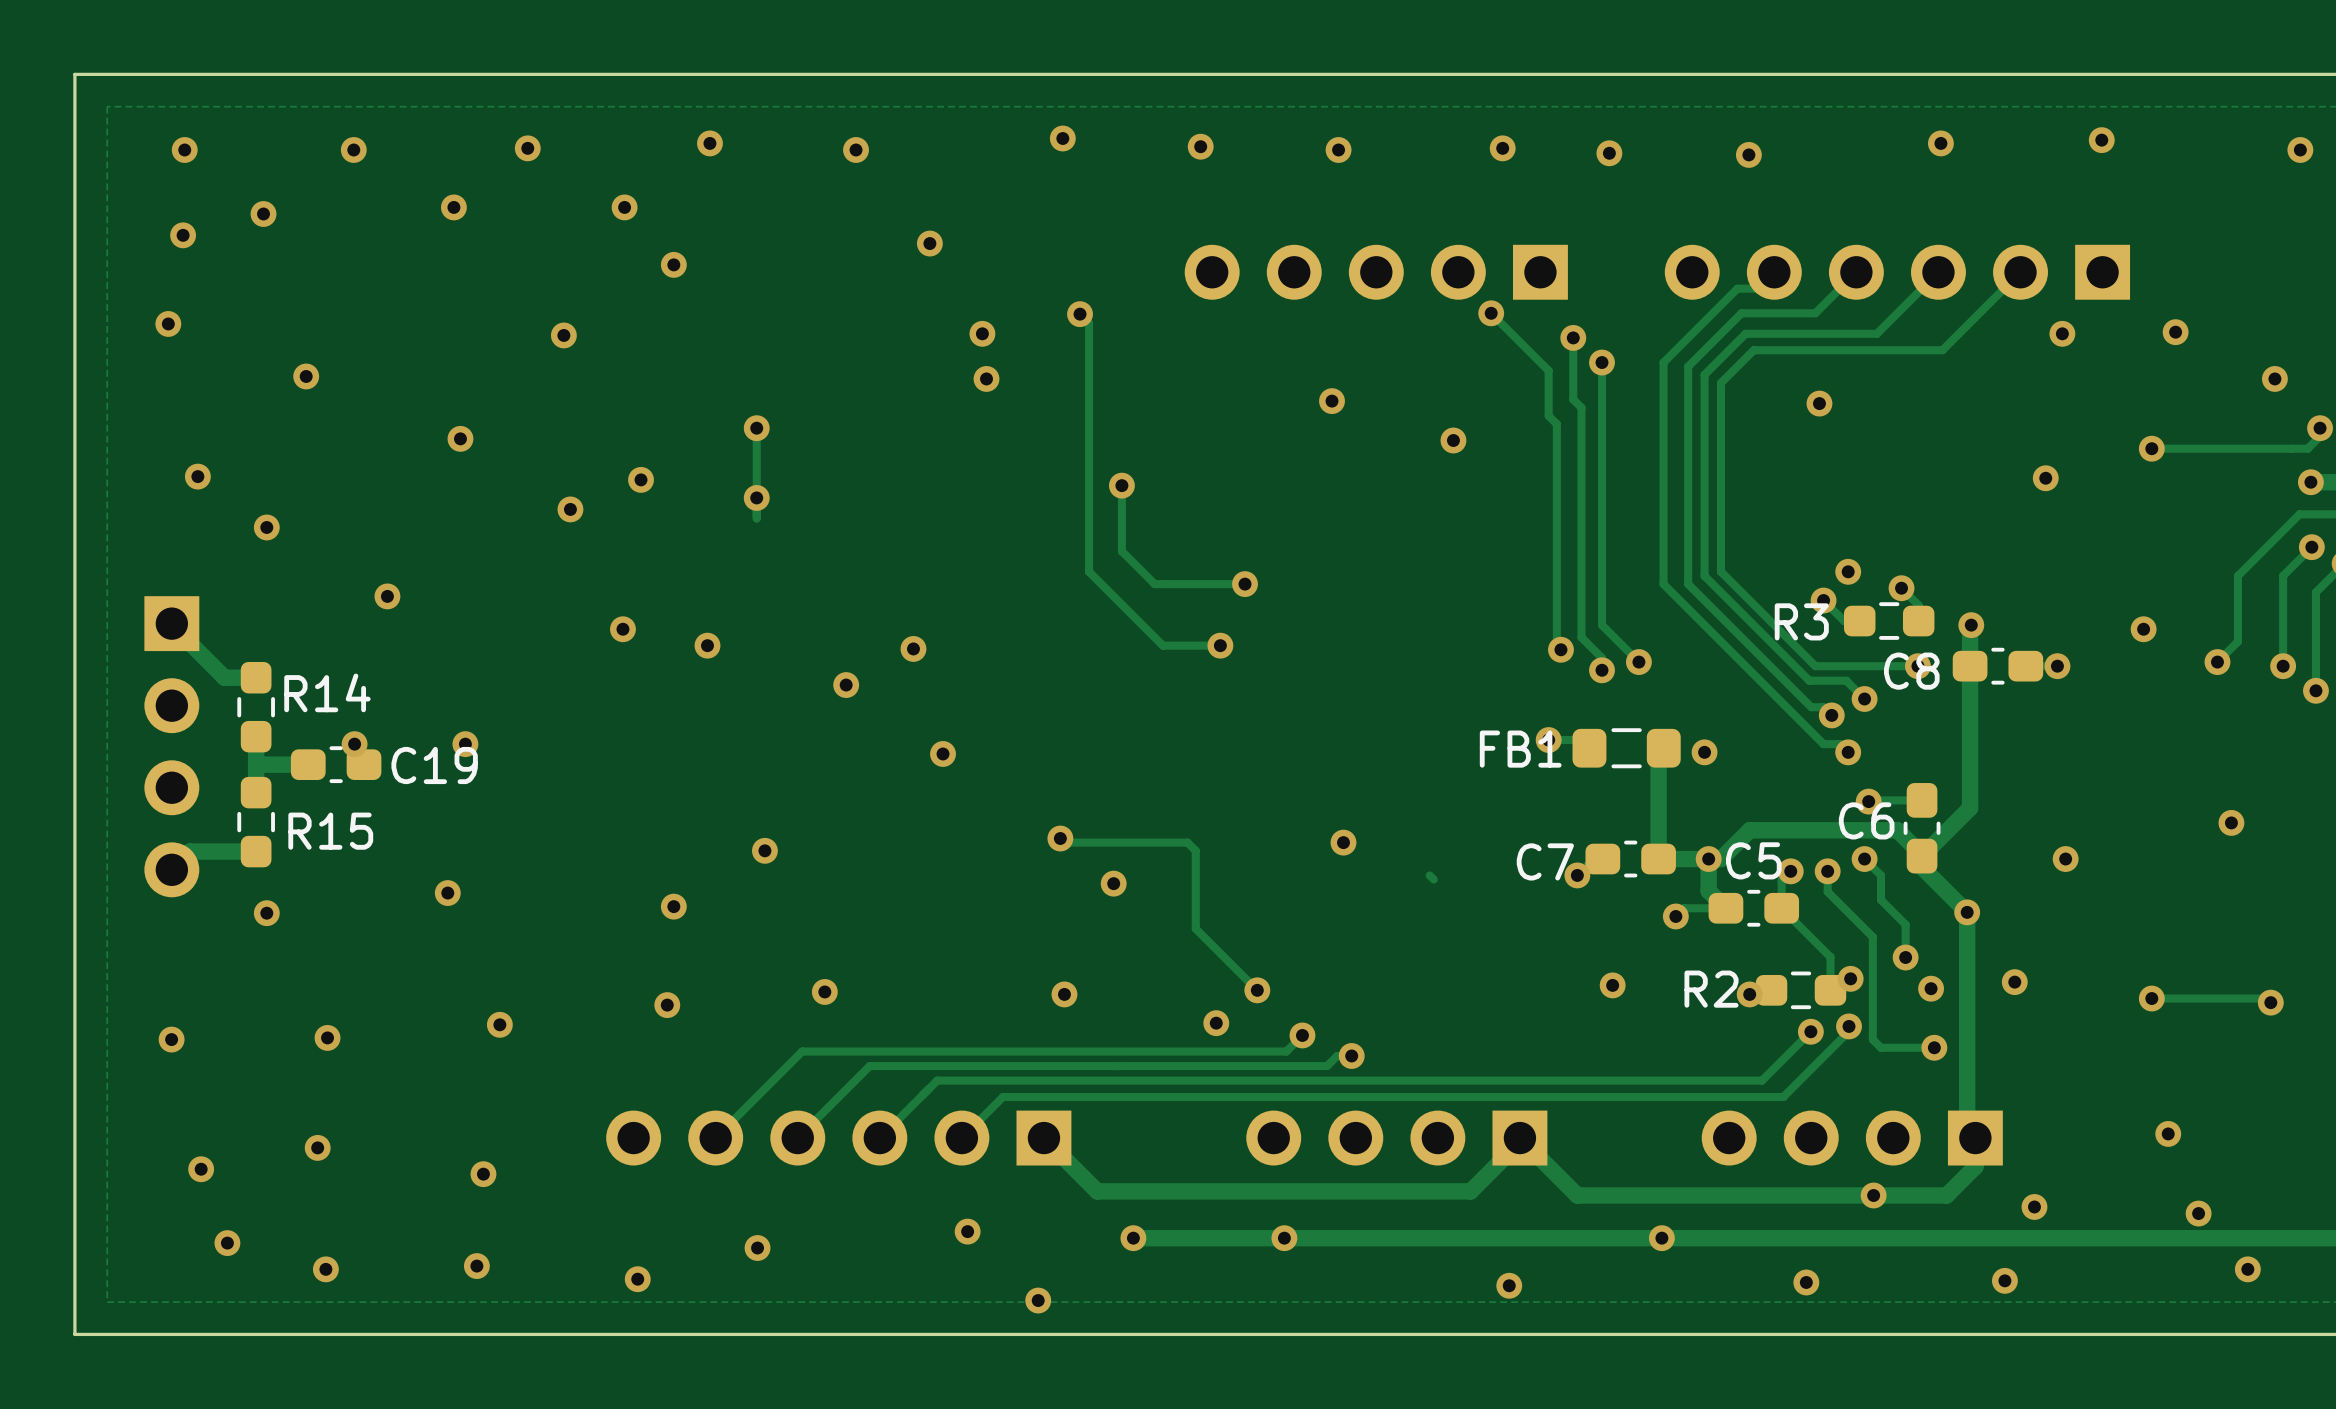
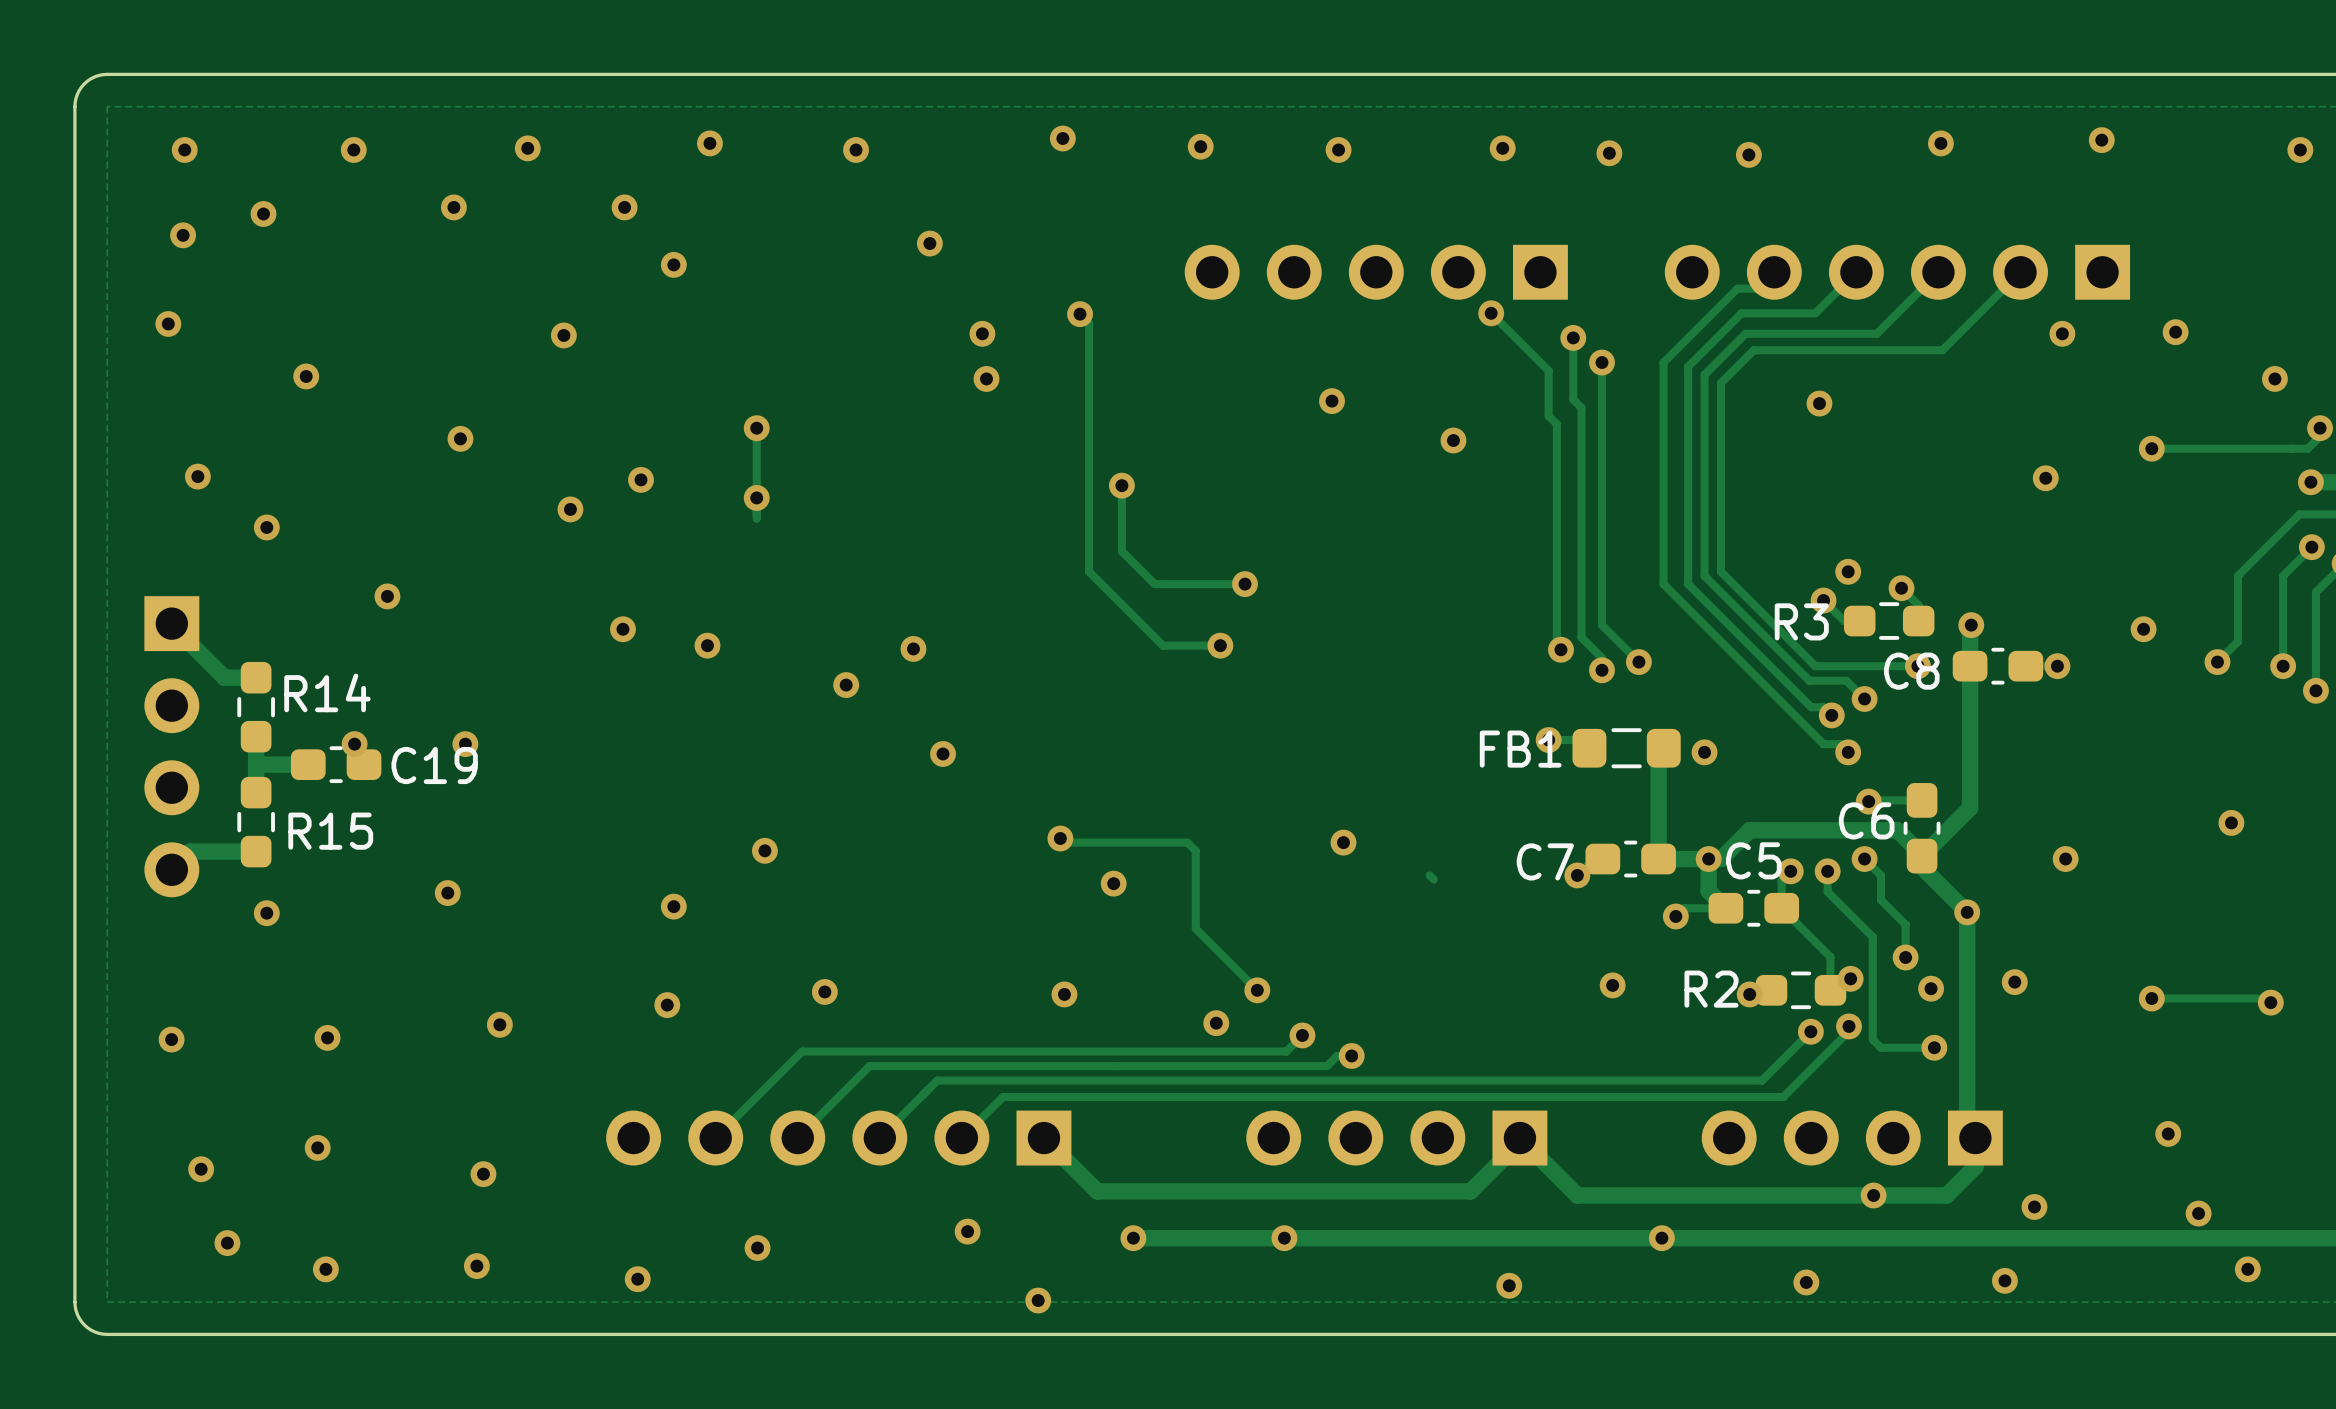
board edge: (107, 74) (74, 74) (74, 106) -> (107, 74) (94, 76) (84, 83) (77, 94) (74, 106)
board edge: (74, 1302) (74, 1334) (107, 1334) -> (74, 1302) (77, 1314) (84, 1324) (94, 1331) (107, 1334)

